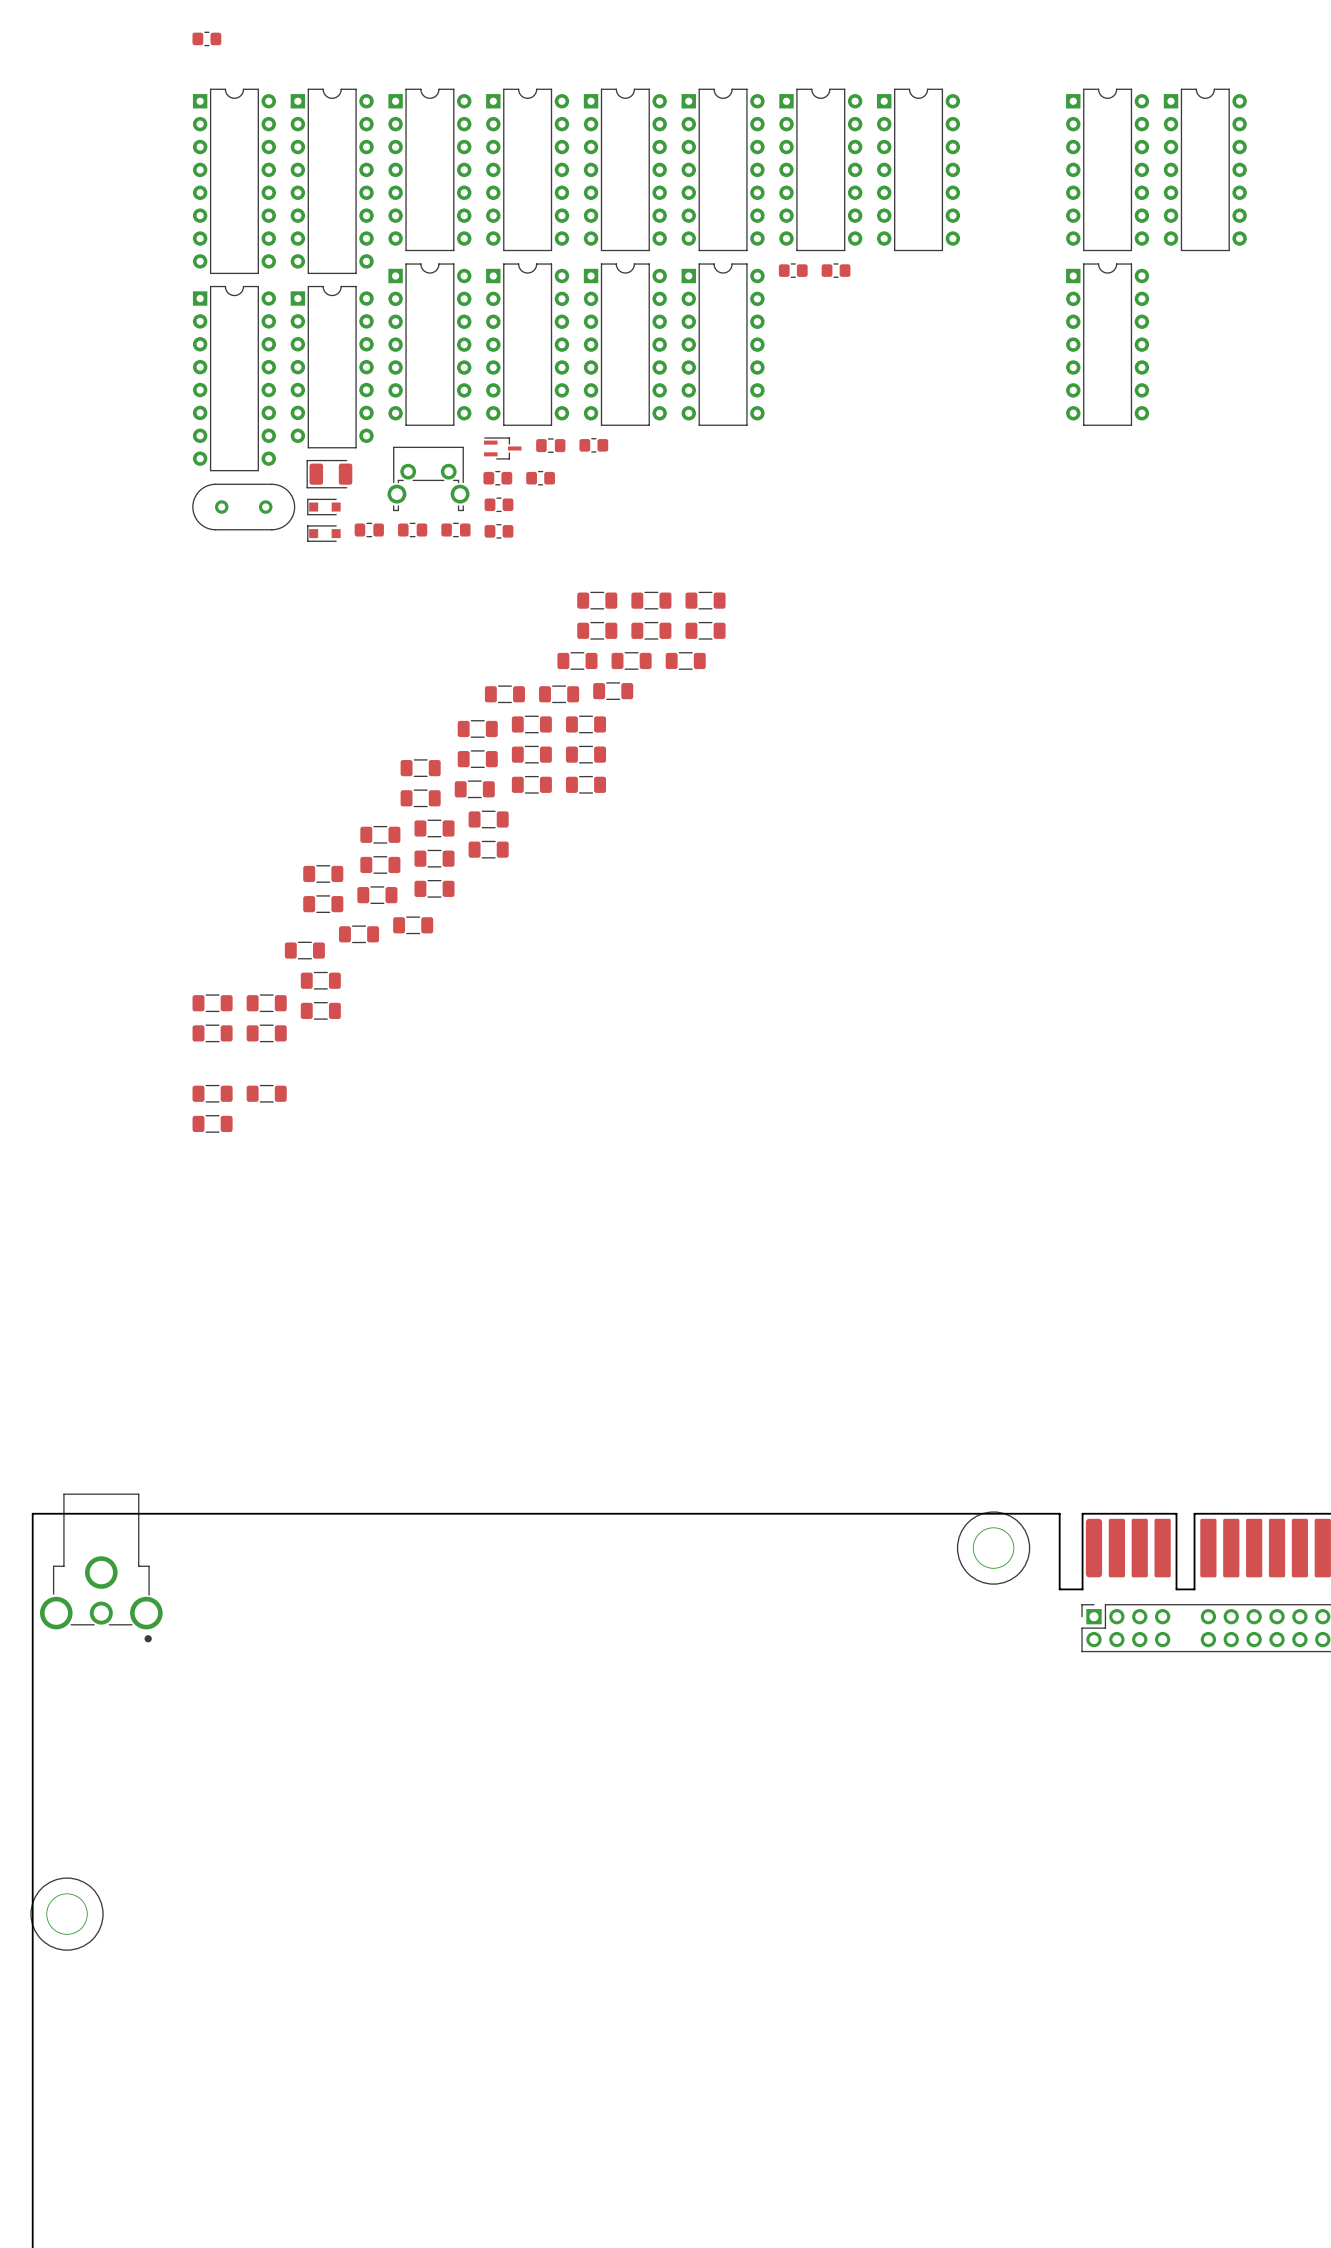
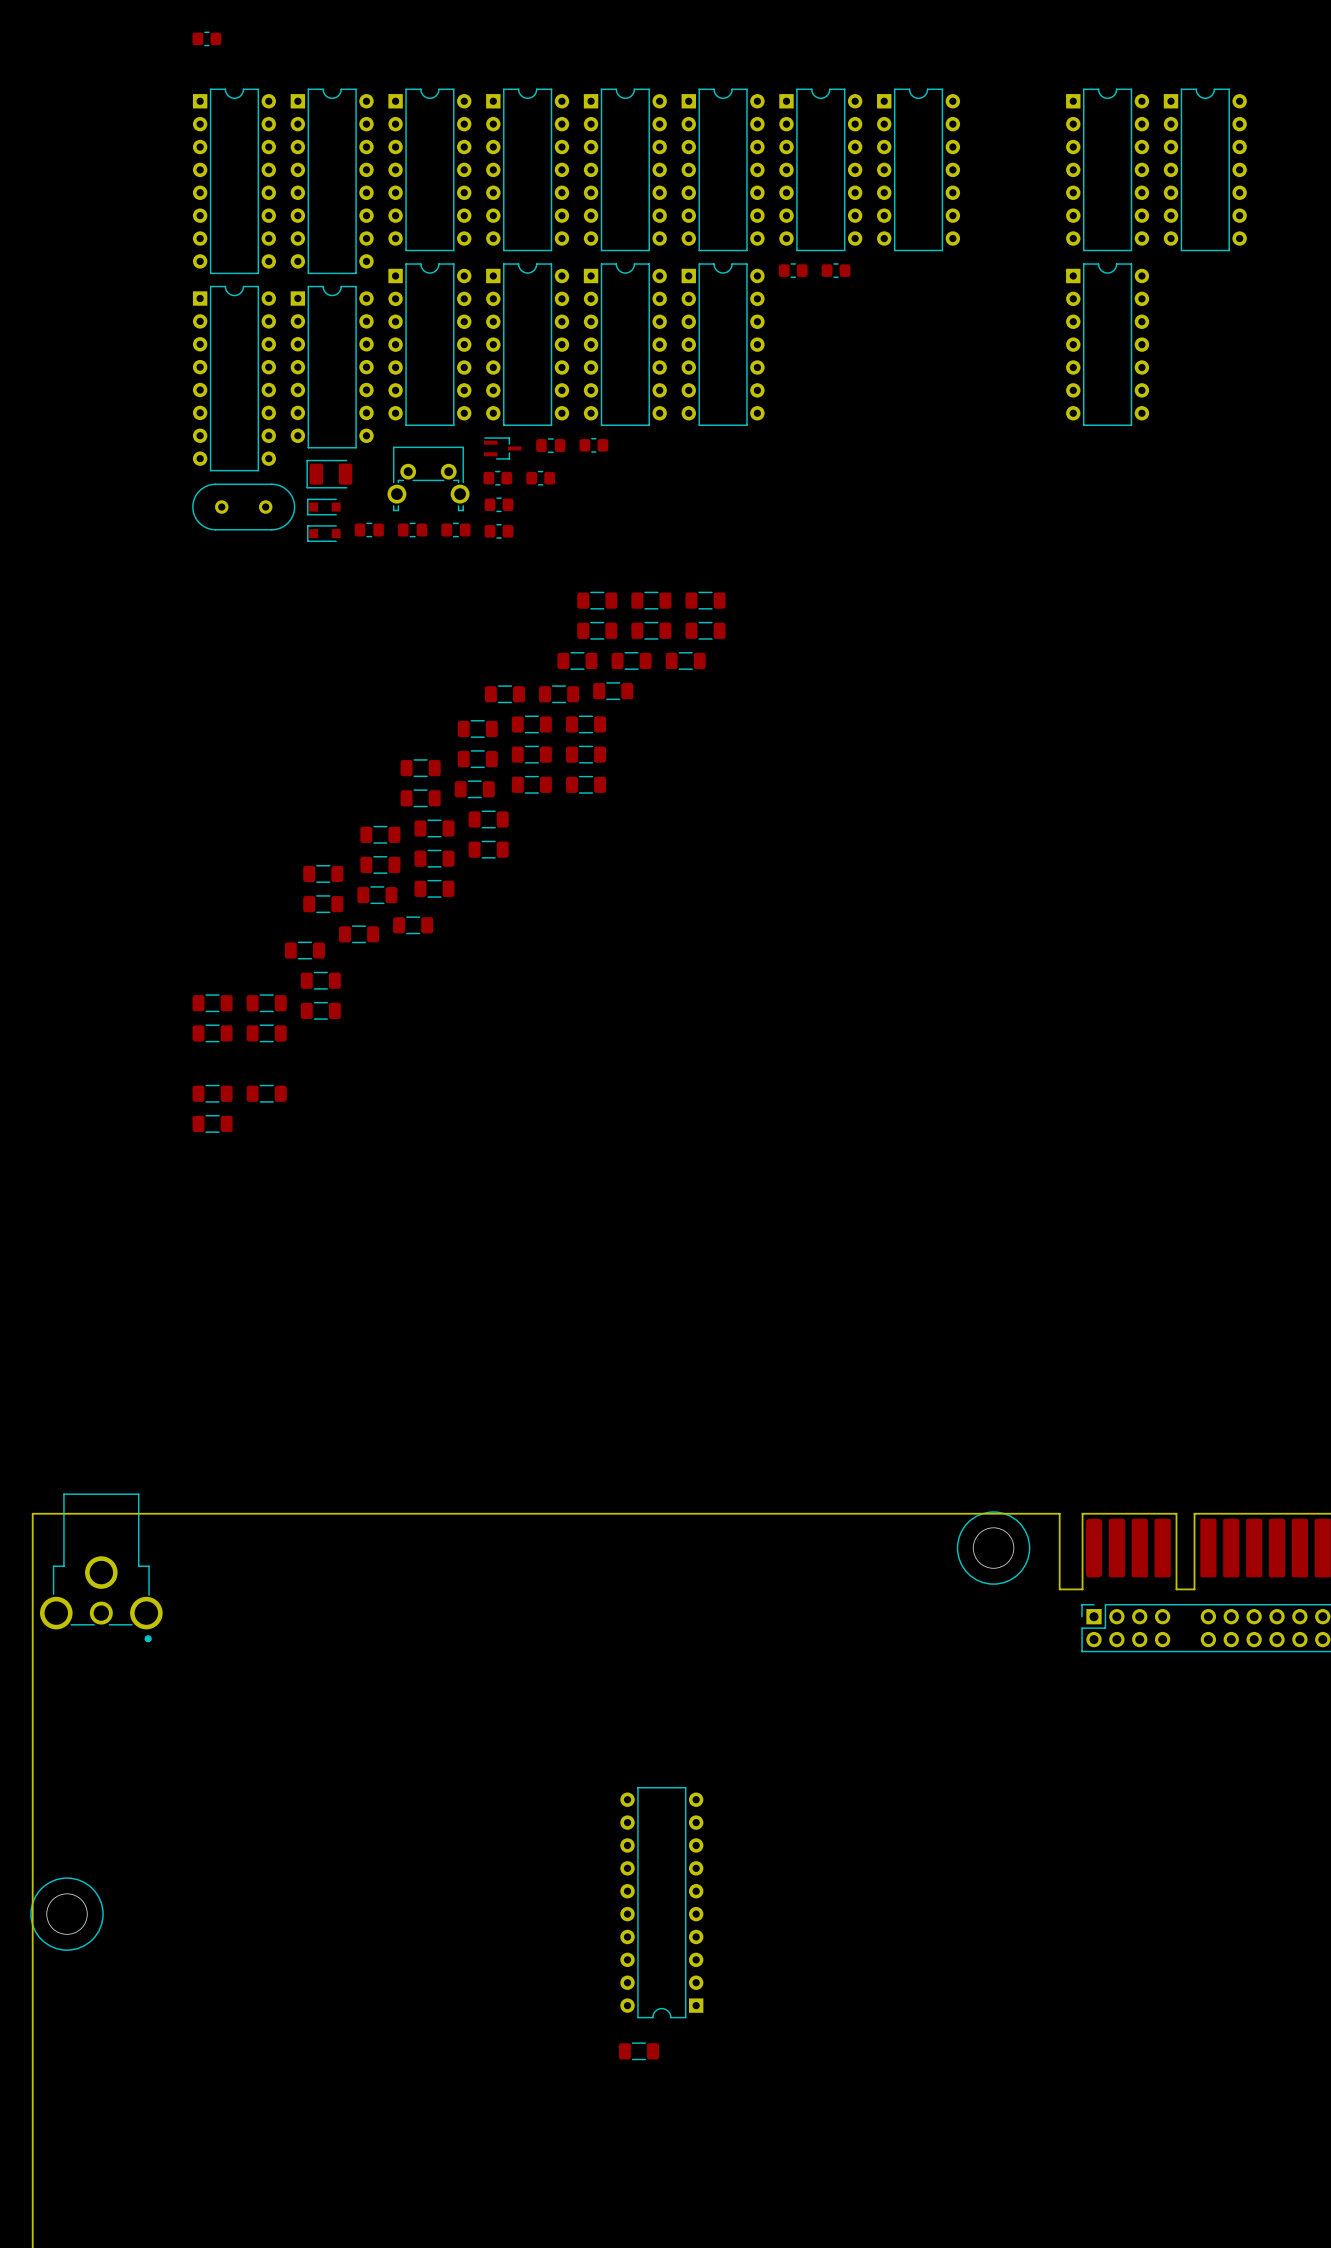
part: none -> (661, 1902)
part: none -> (638, 2051)

